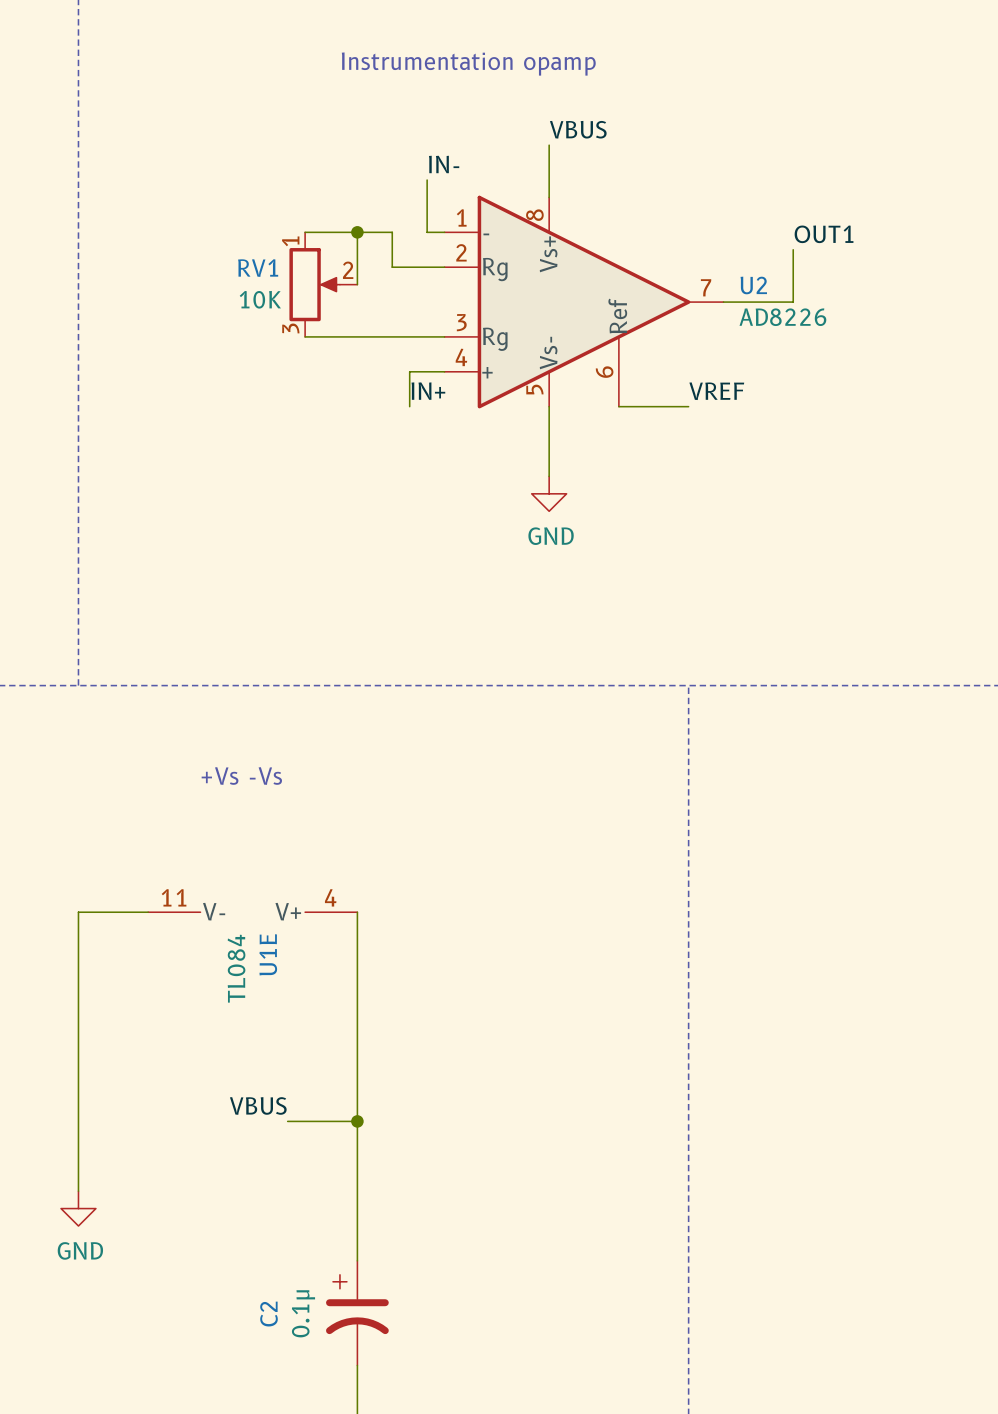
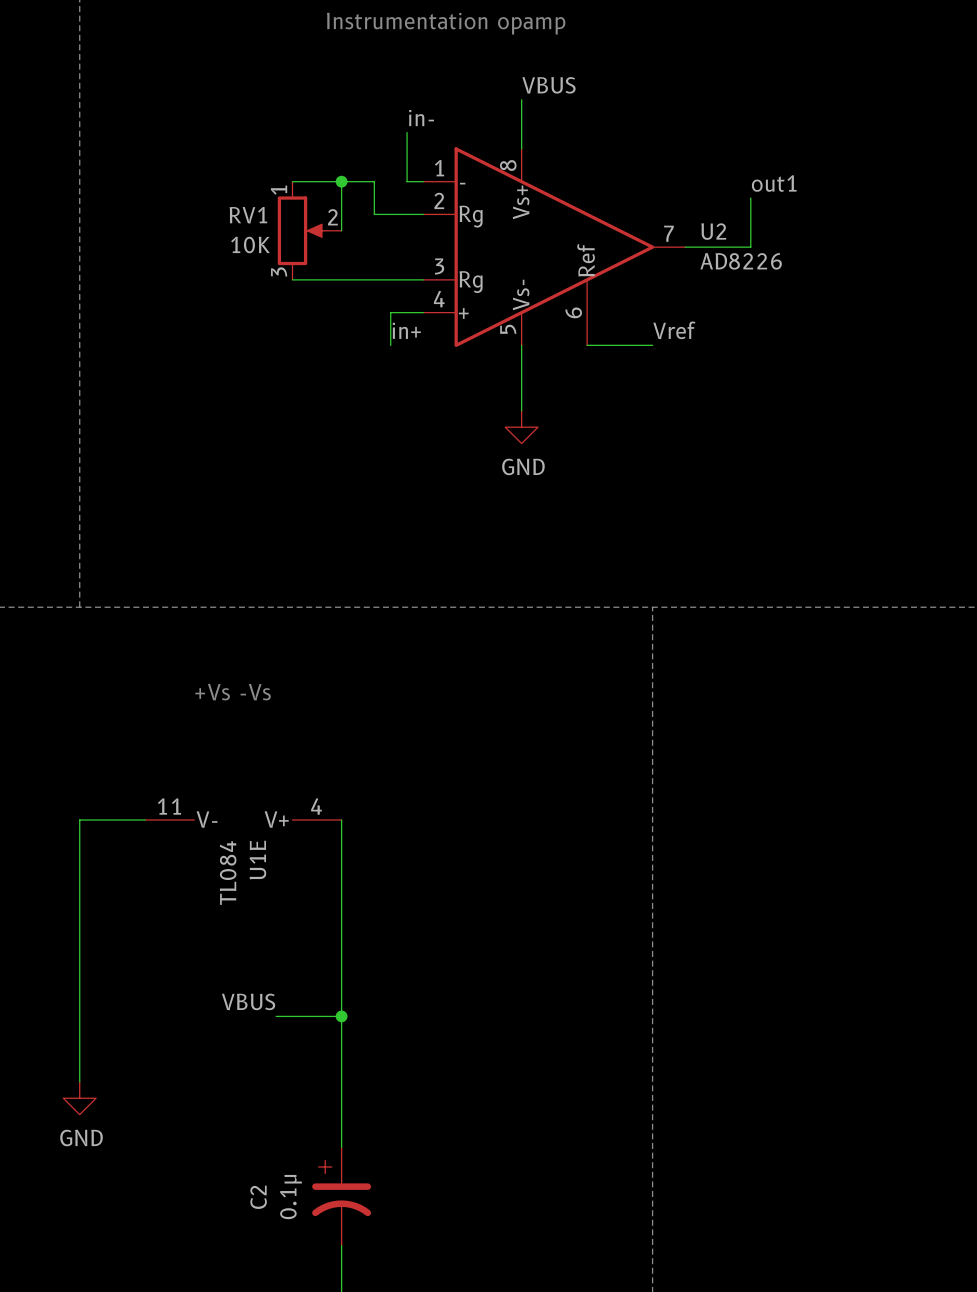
label: IN- (444, 164) -> in- (421, 118)
label: OUT1 (824, 234) -> out1 (774, 183)
label: IN+ (428, 391) -> in+ (406, 330)
label: VREF (716, 391) -> Vref (674, 330)

